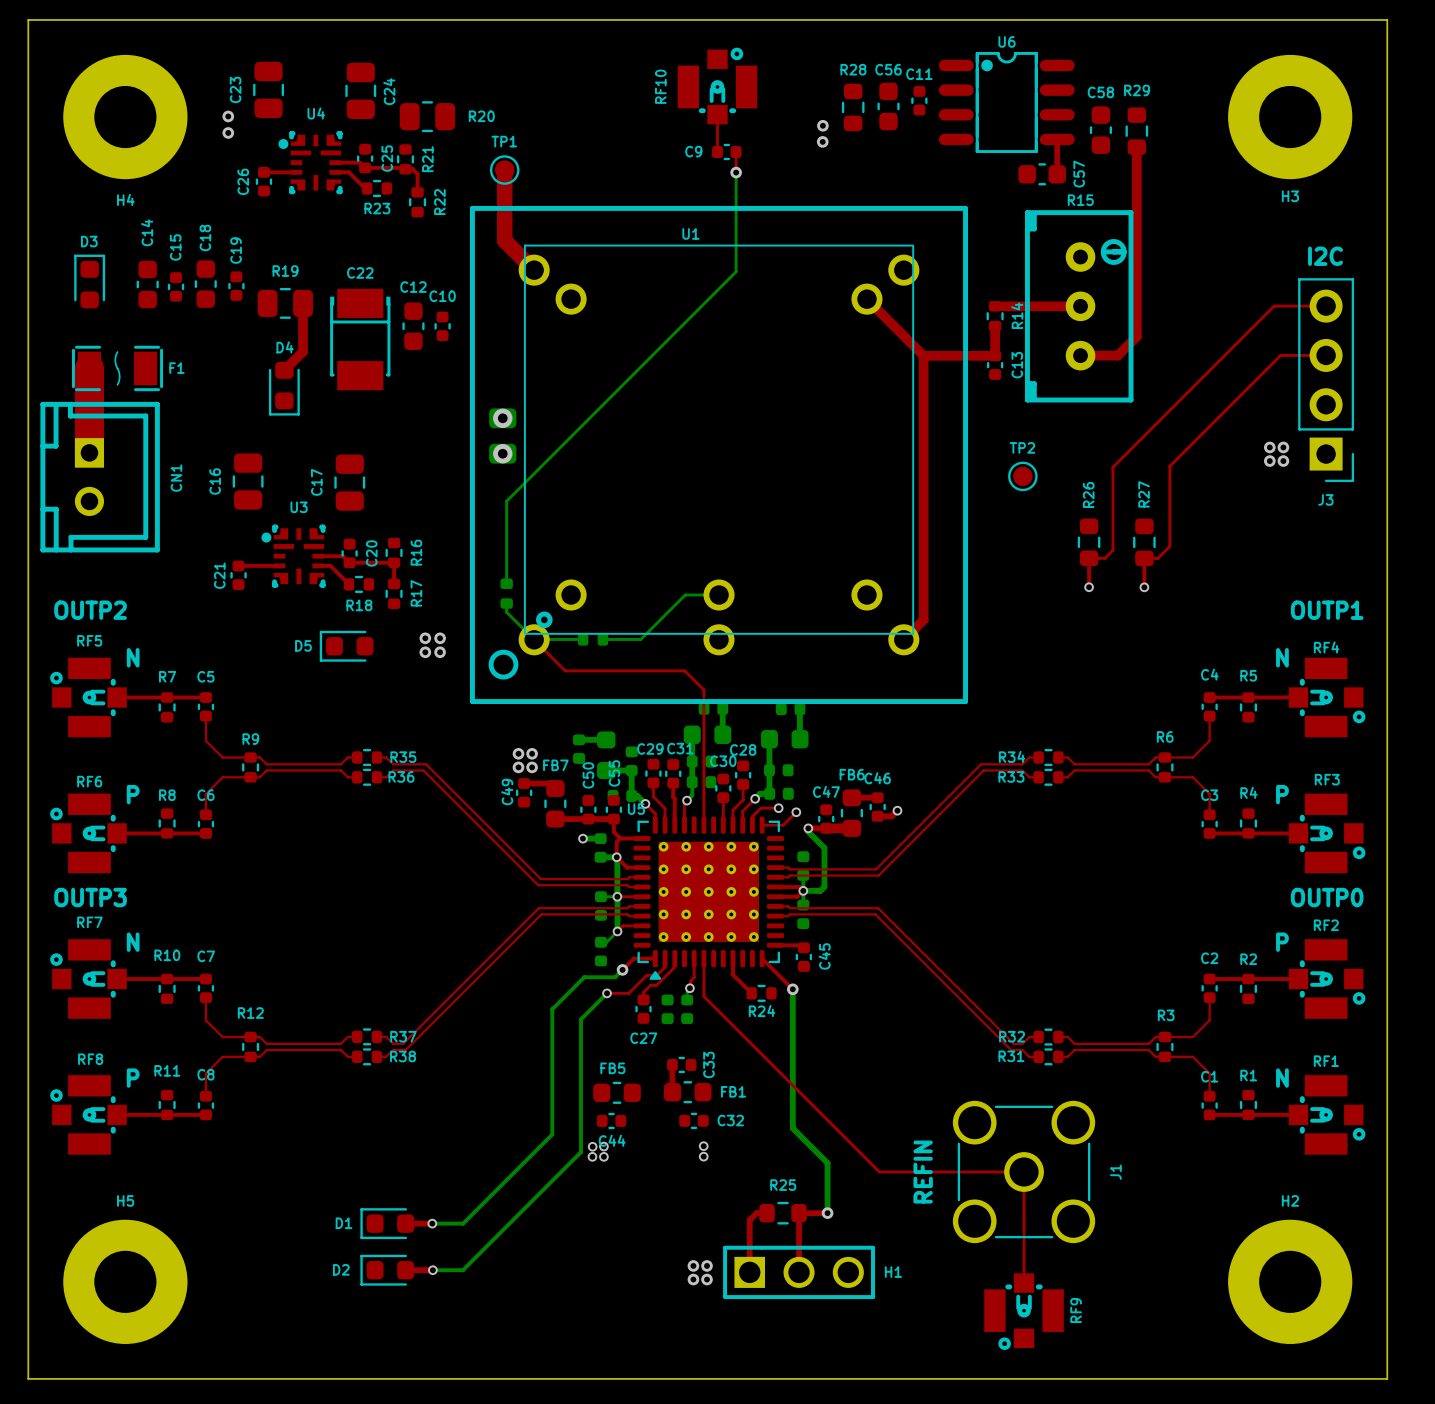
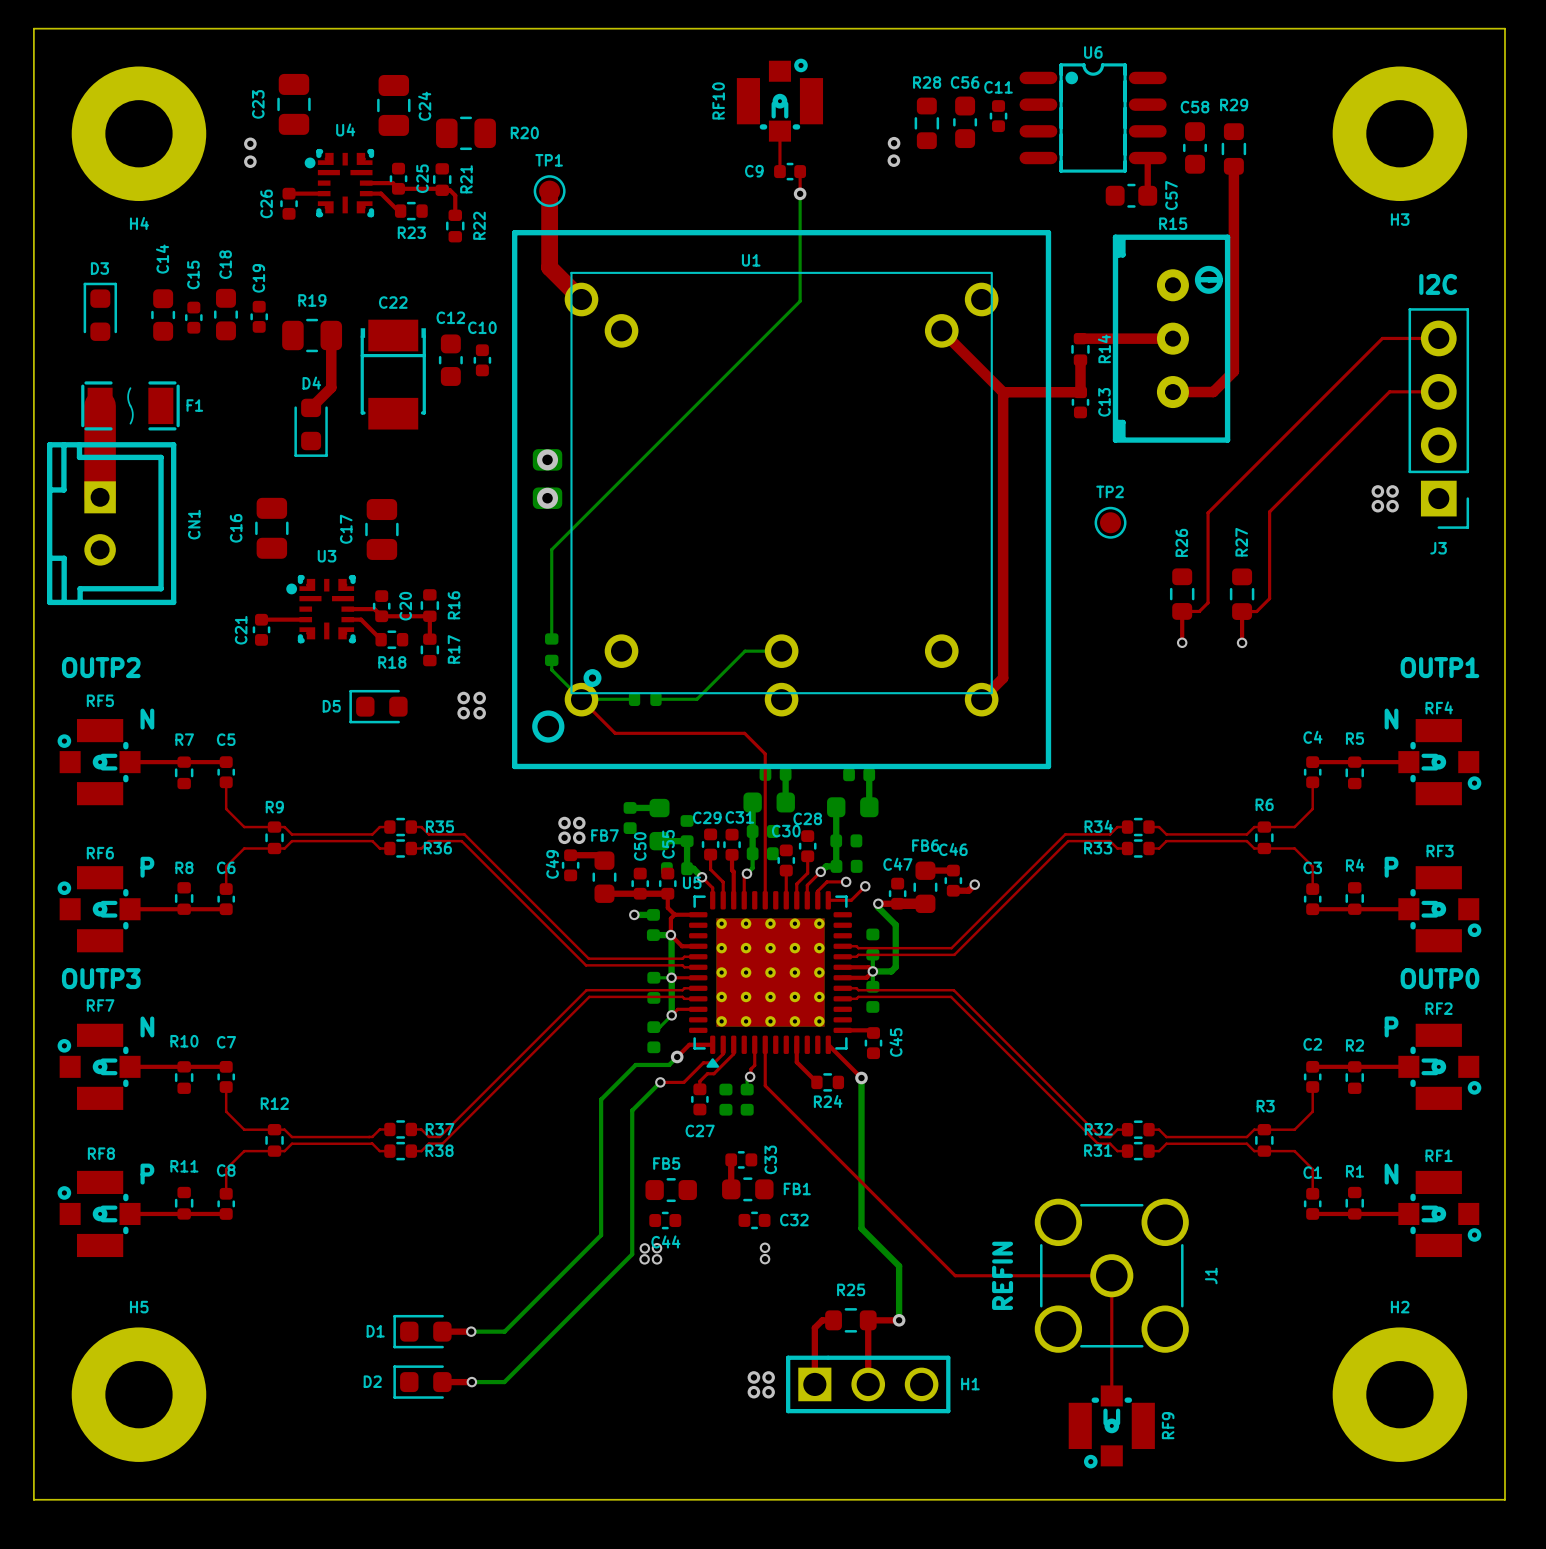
via: (228, 116) -> none
via: none -> (250, 143)
via: (228, 132) -> none
via: none -> (250, 161)

